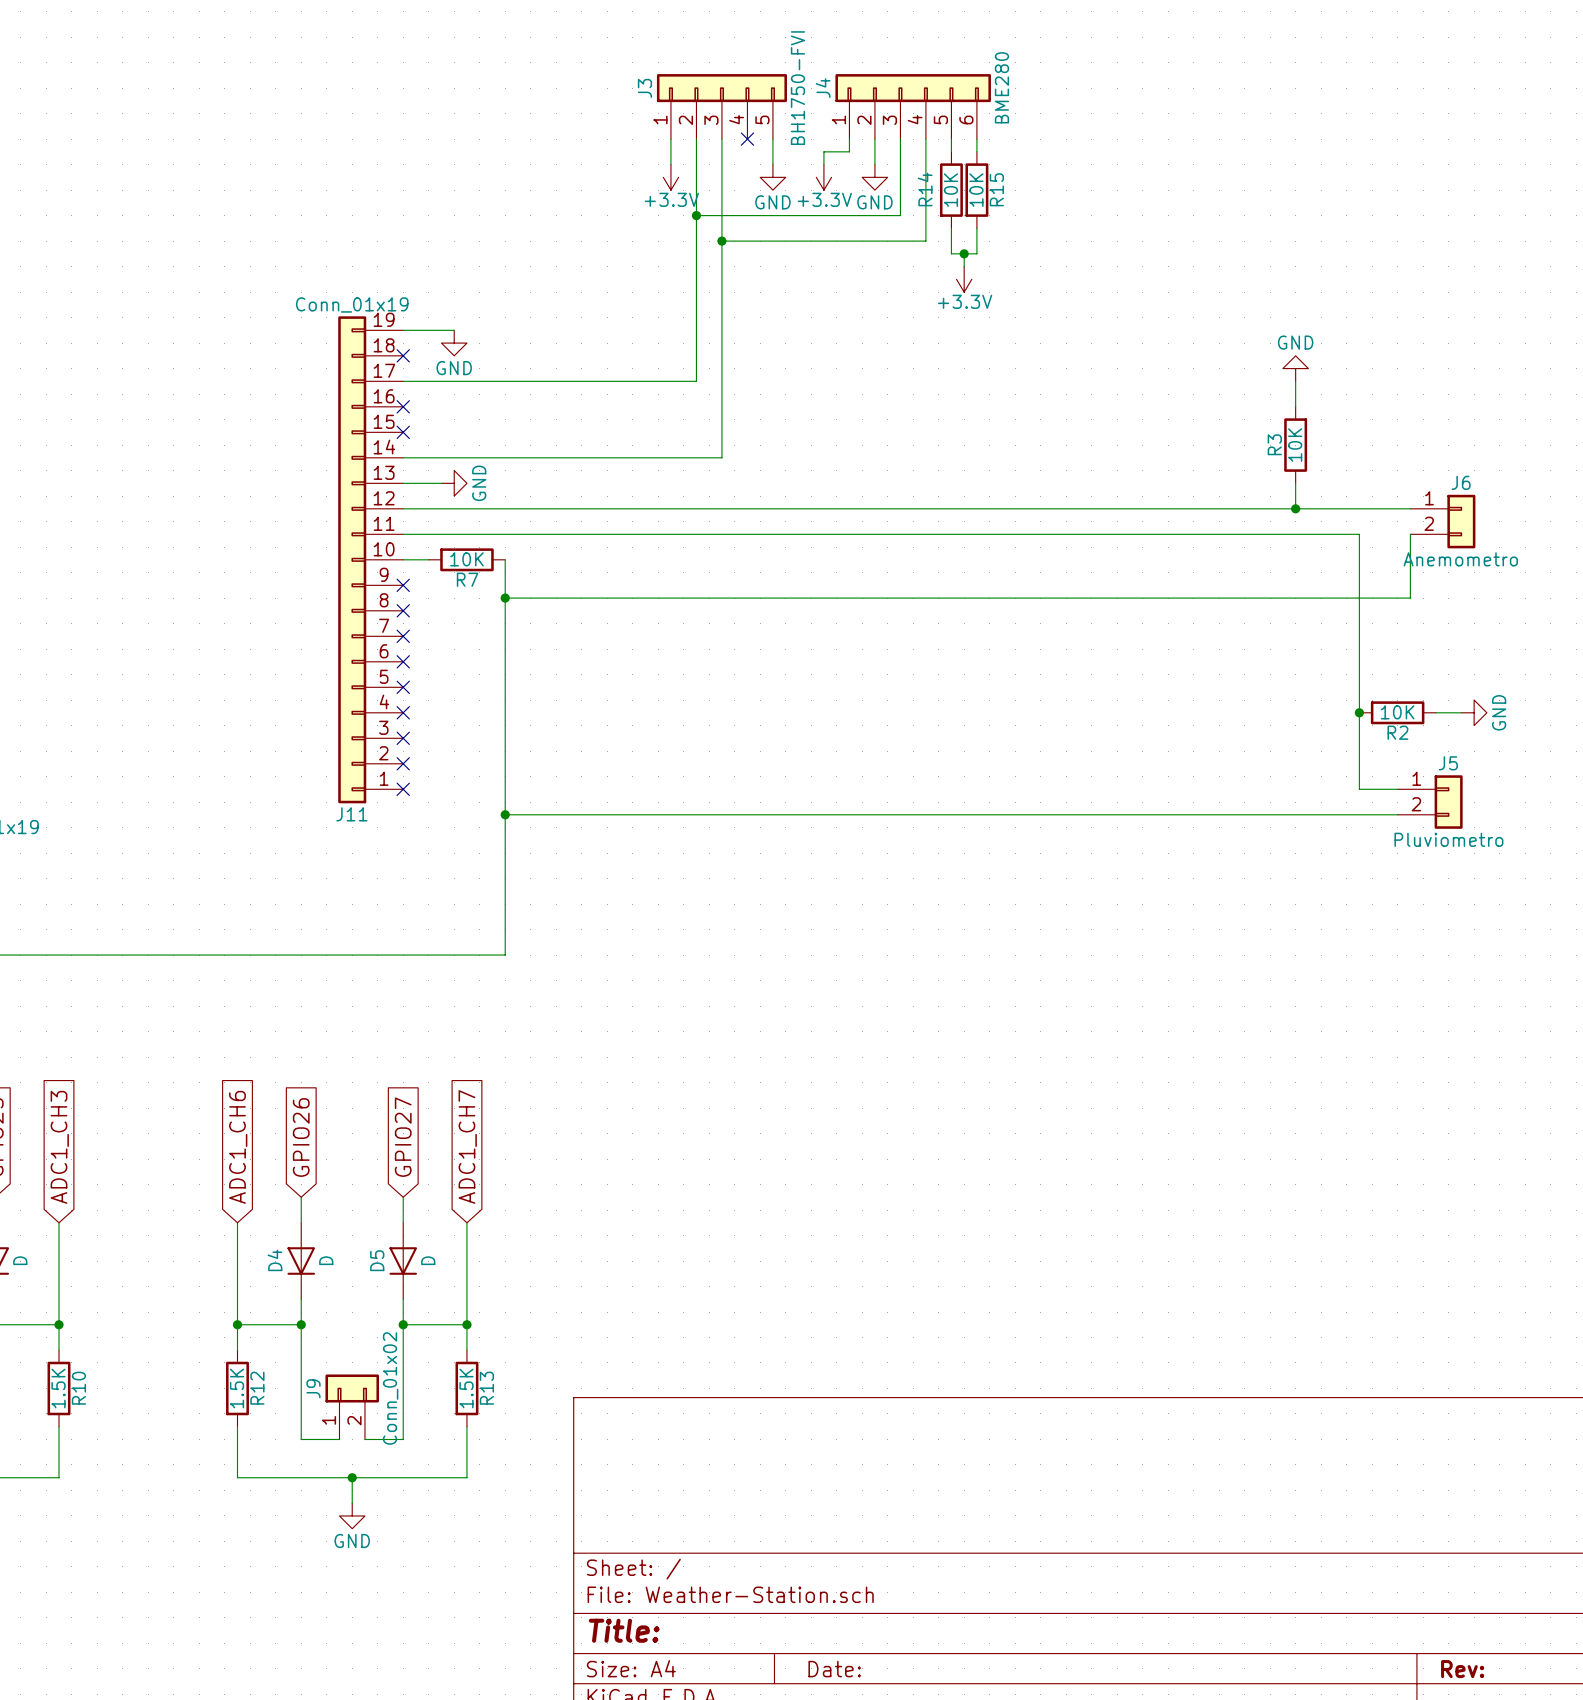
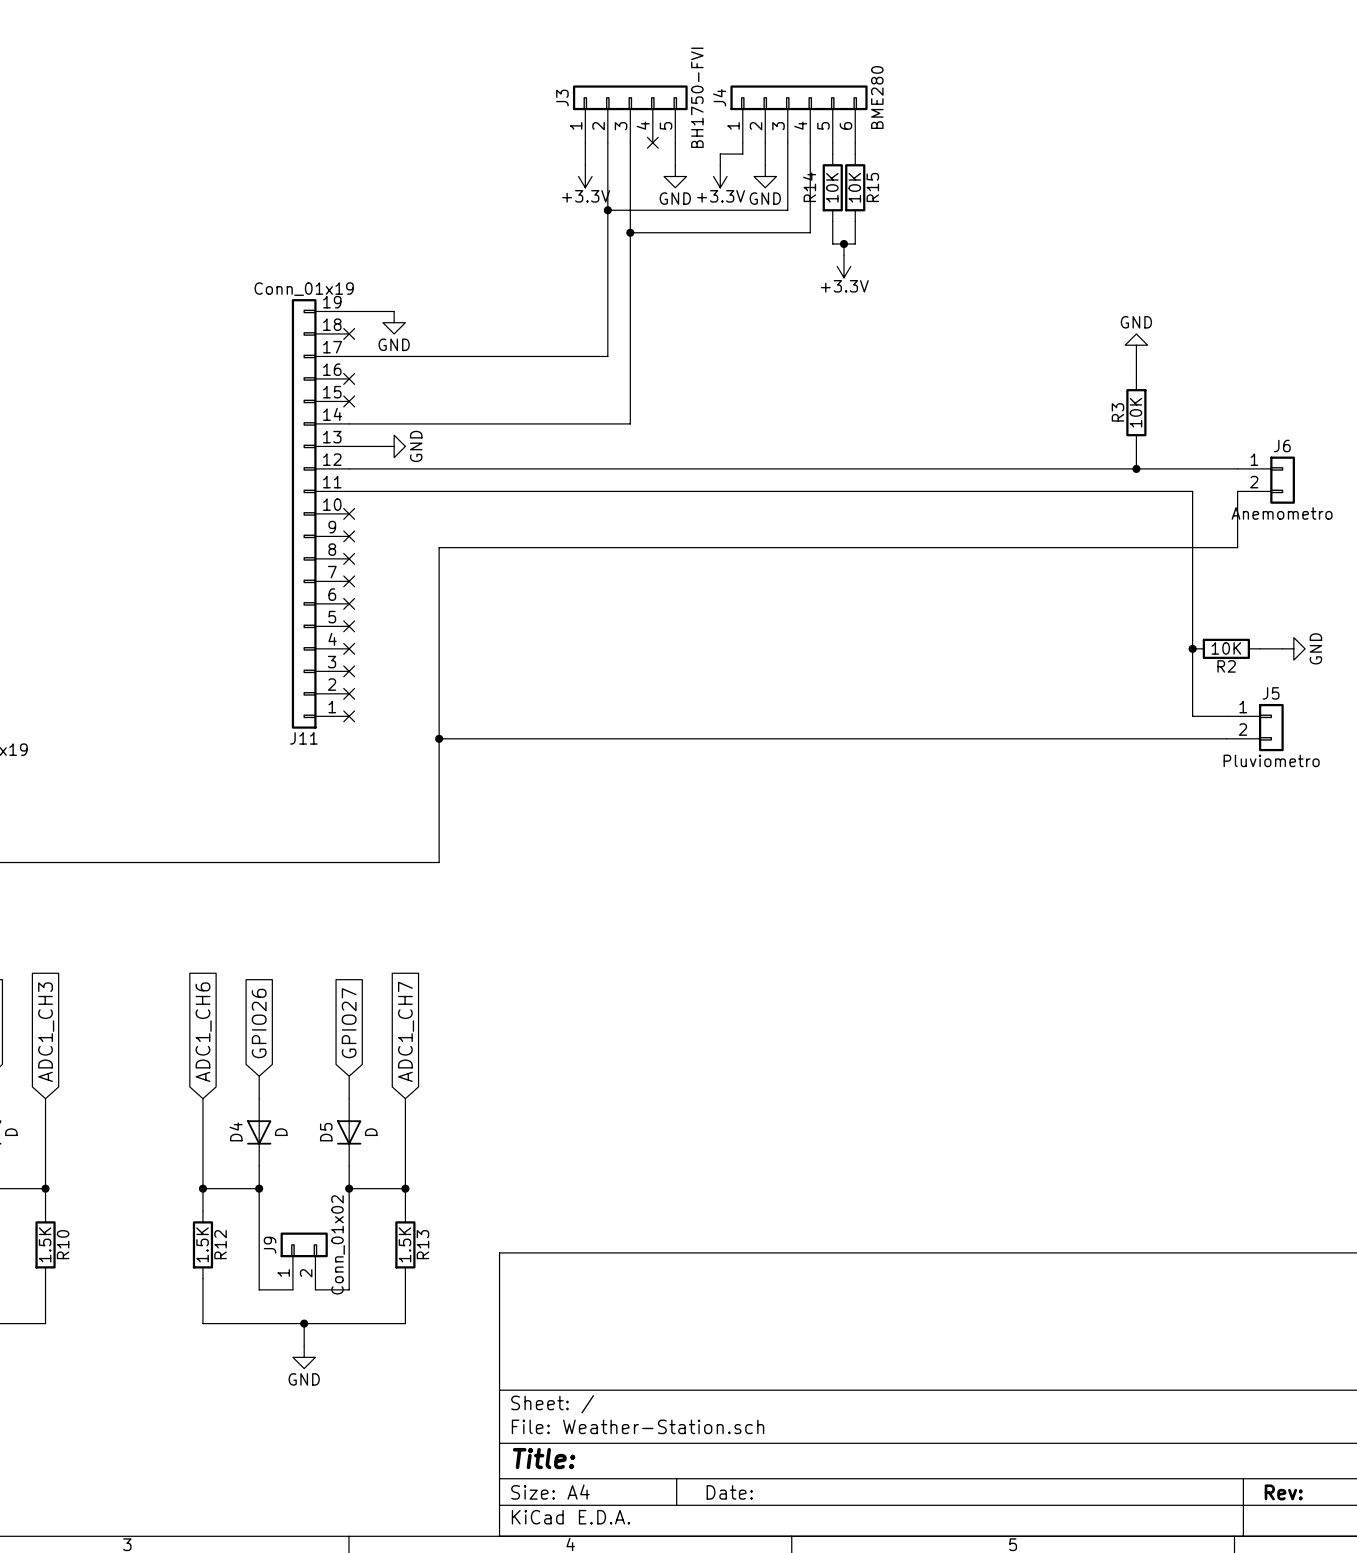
wire: (403, 559) (428, 559) -> none
no-connect mark: none -> (349, 513)
R7: 10K (466, 559) -> none
wire: (505, 559) (505, 598) -> none
junction: (505, 598) -> none

